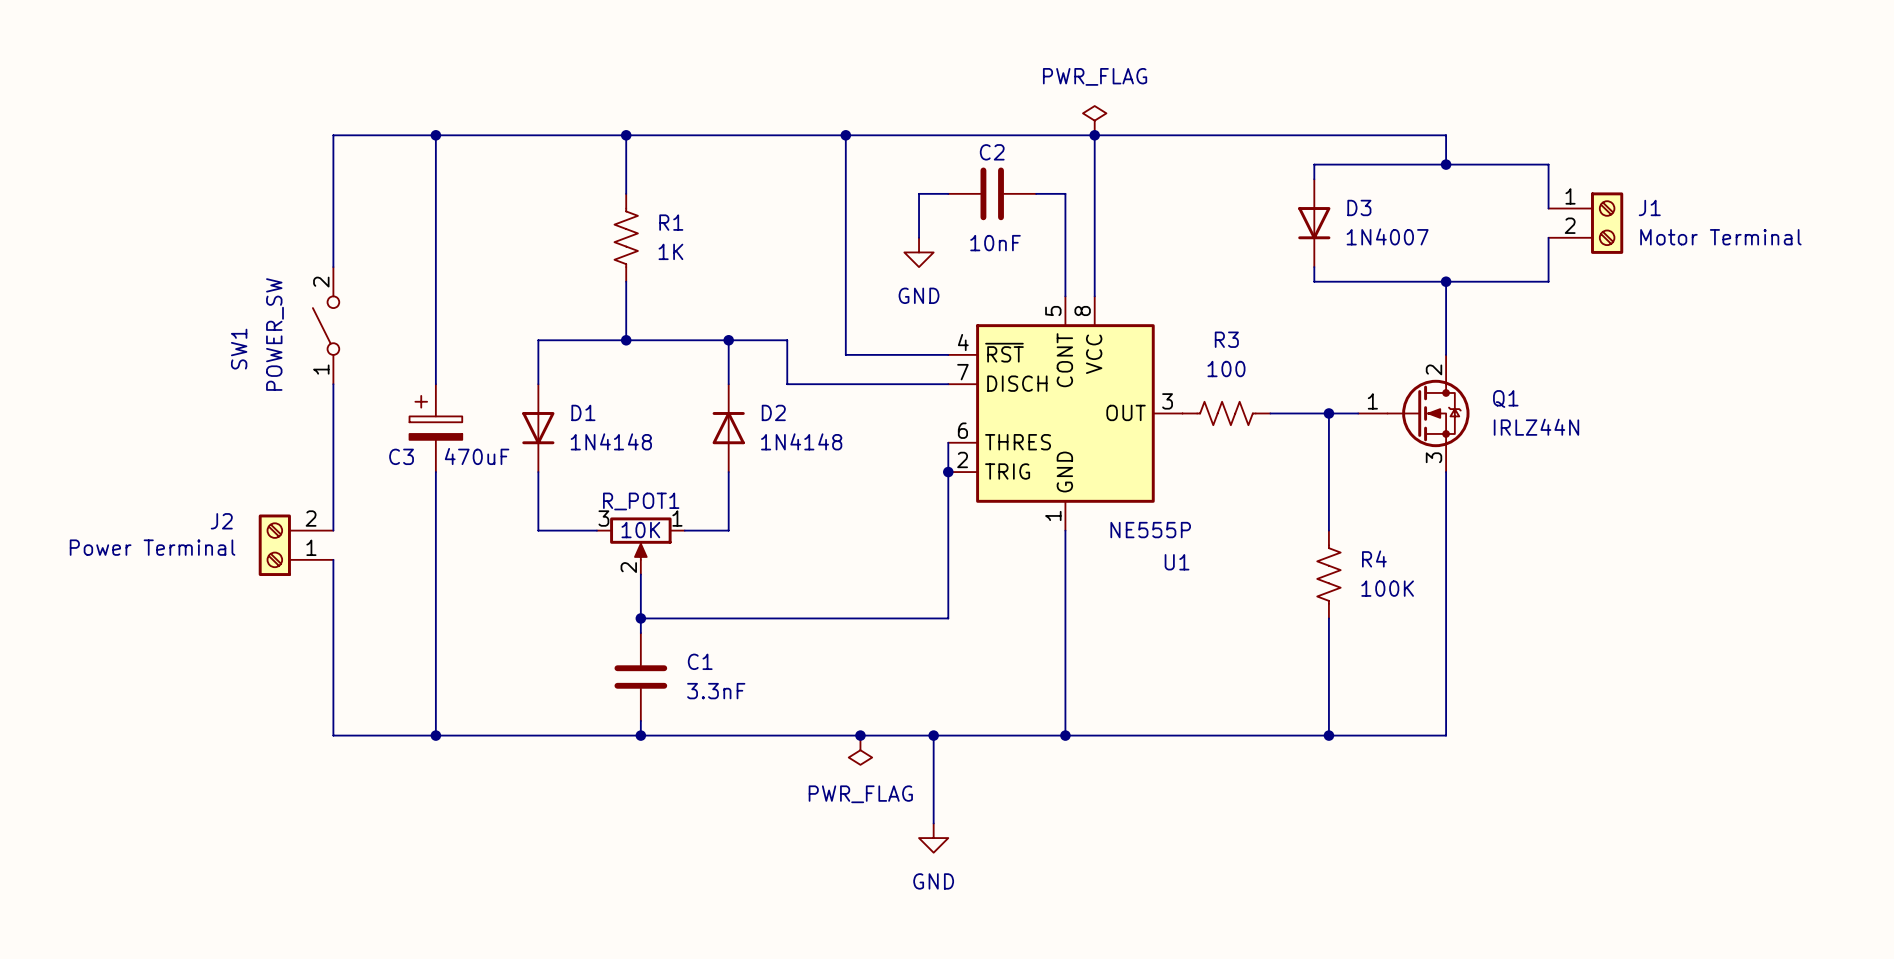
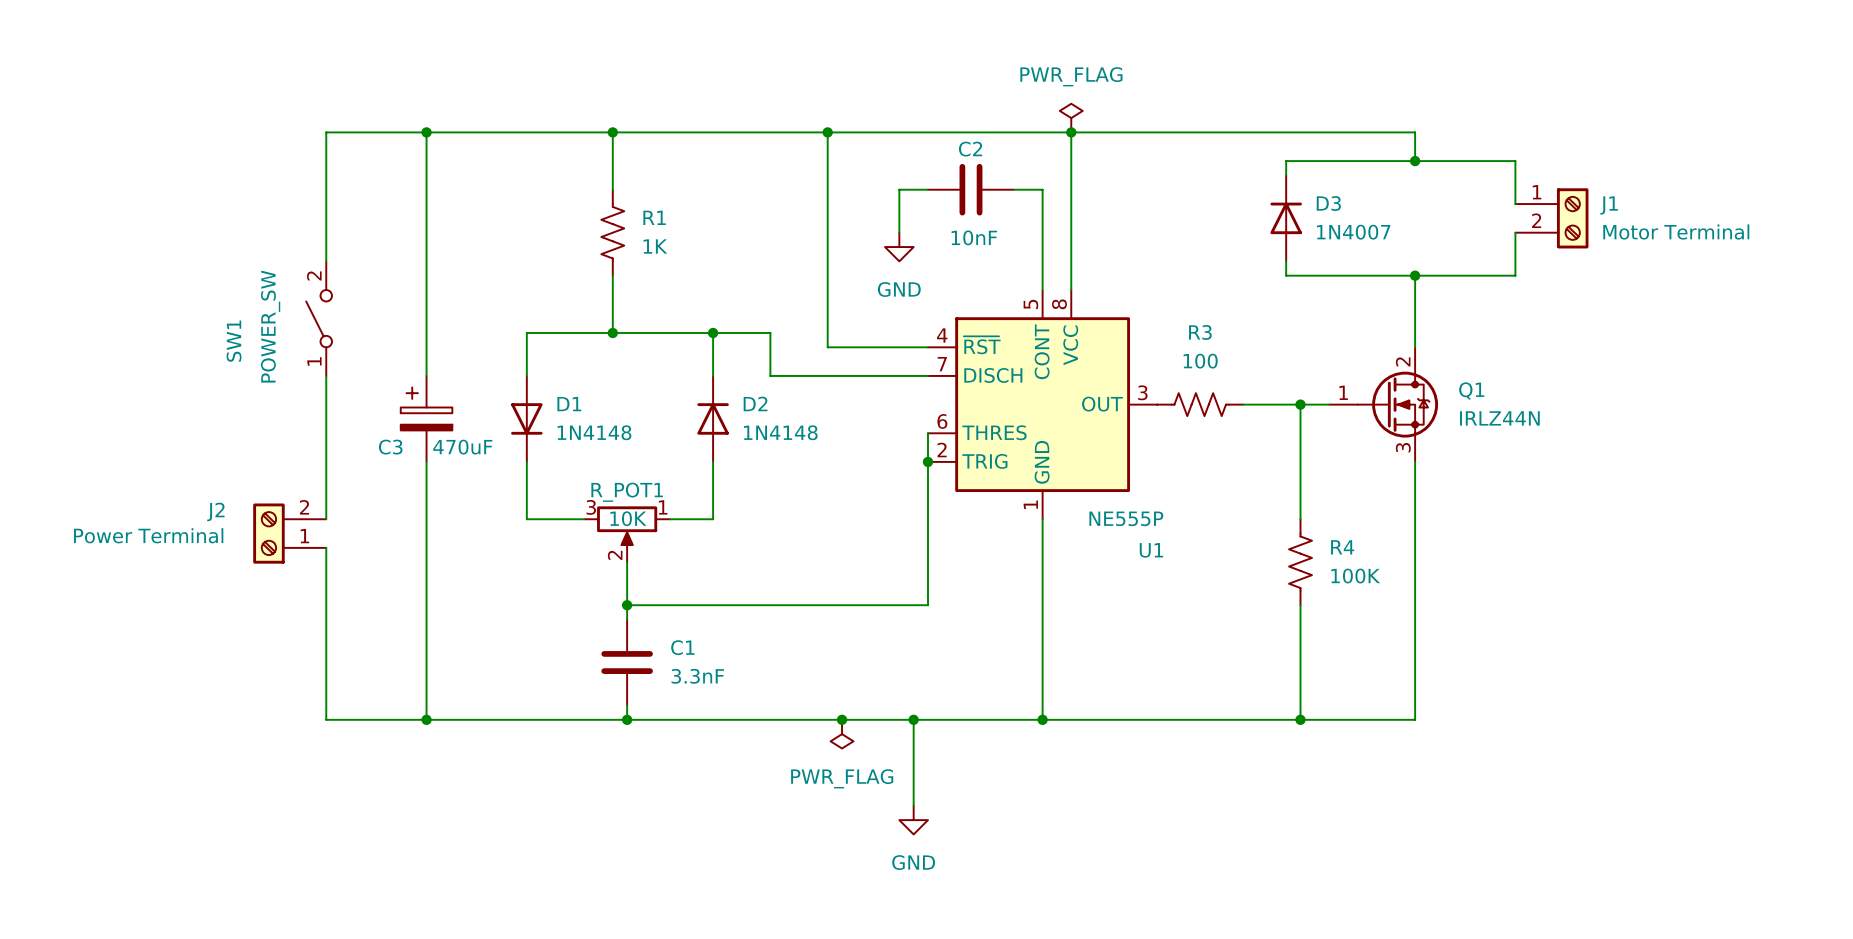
D3 rotation: 0° (1314, 223) -> 180° (1286, 218)

